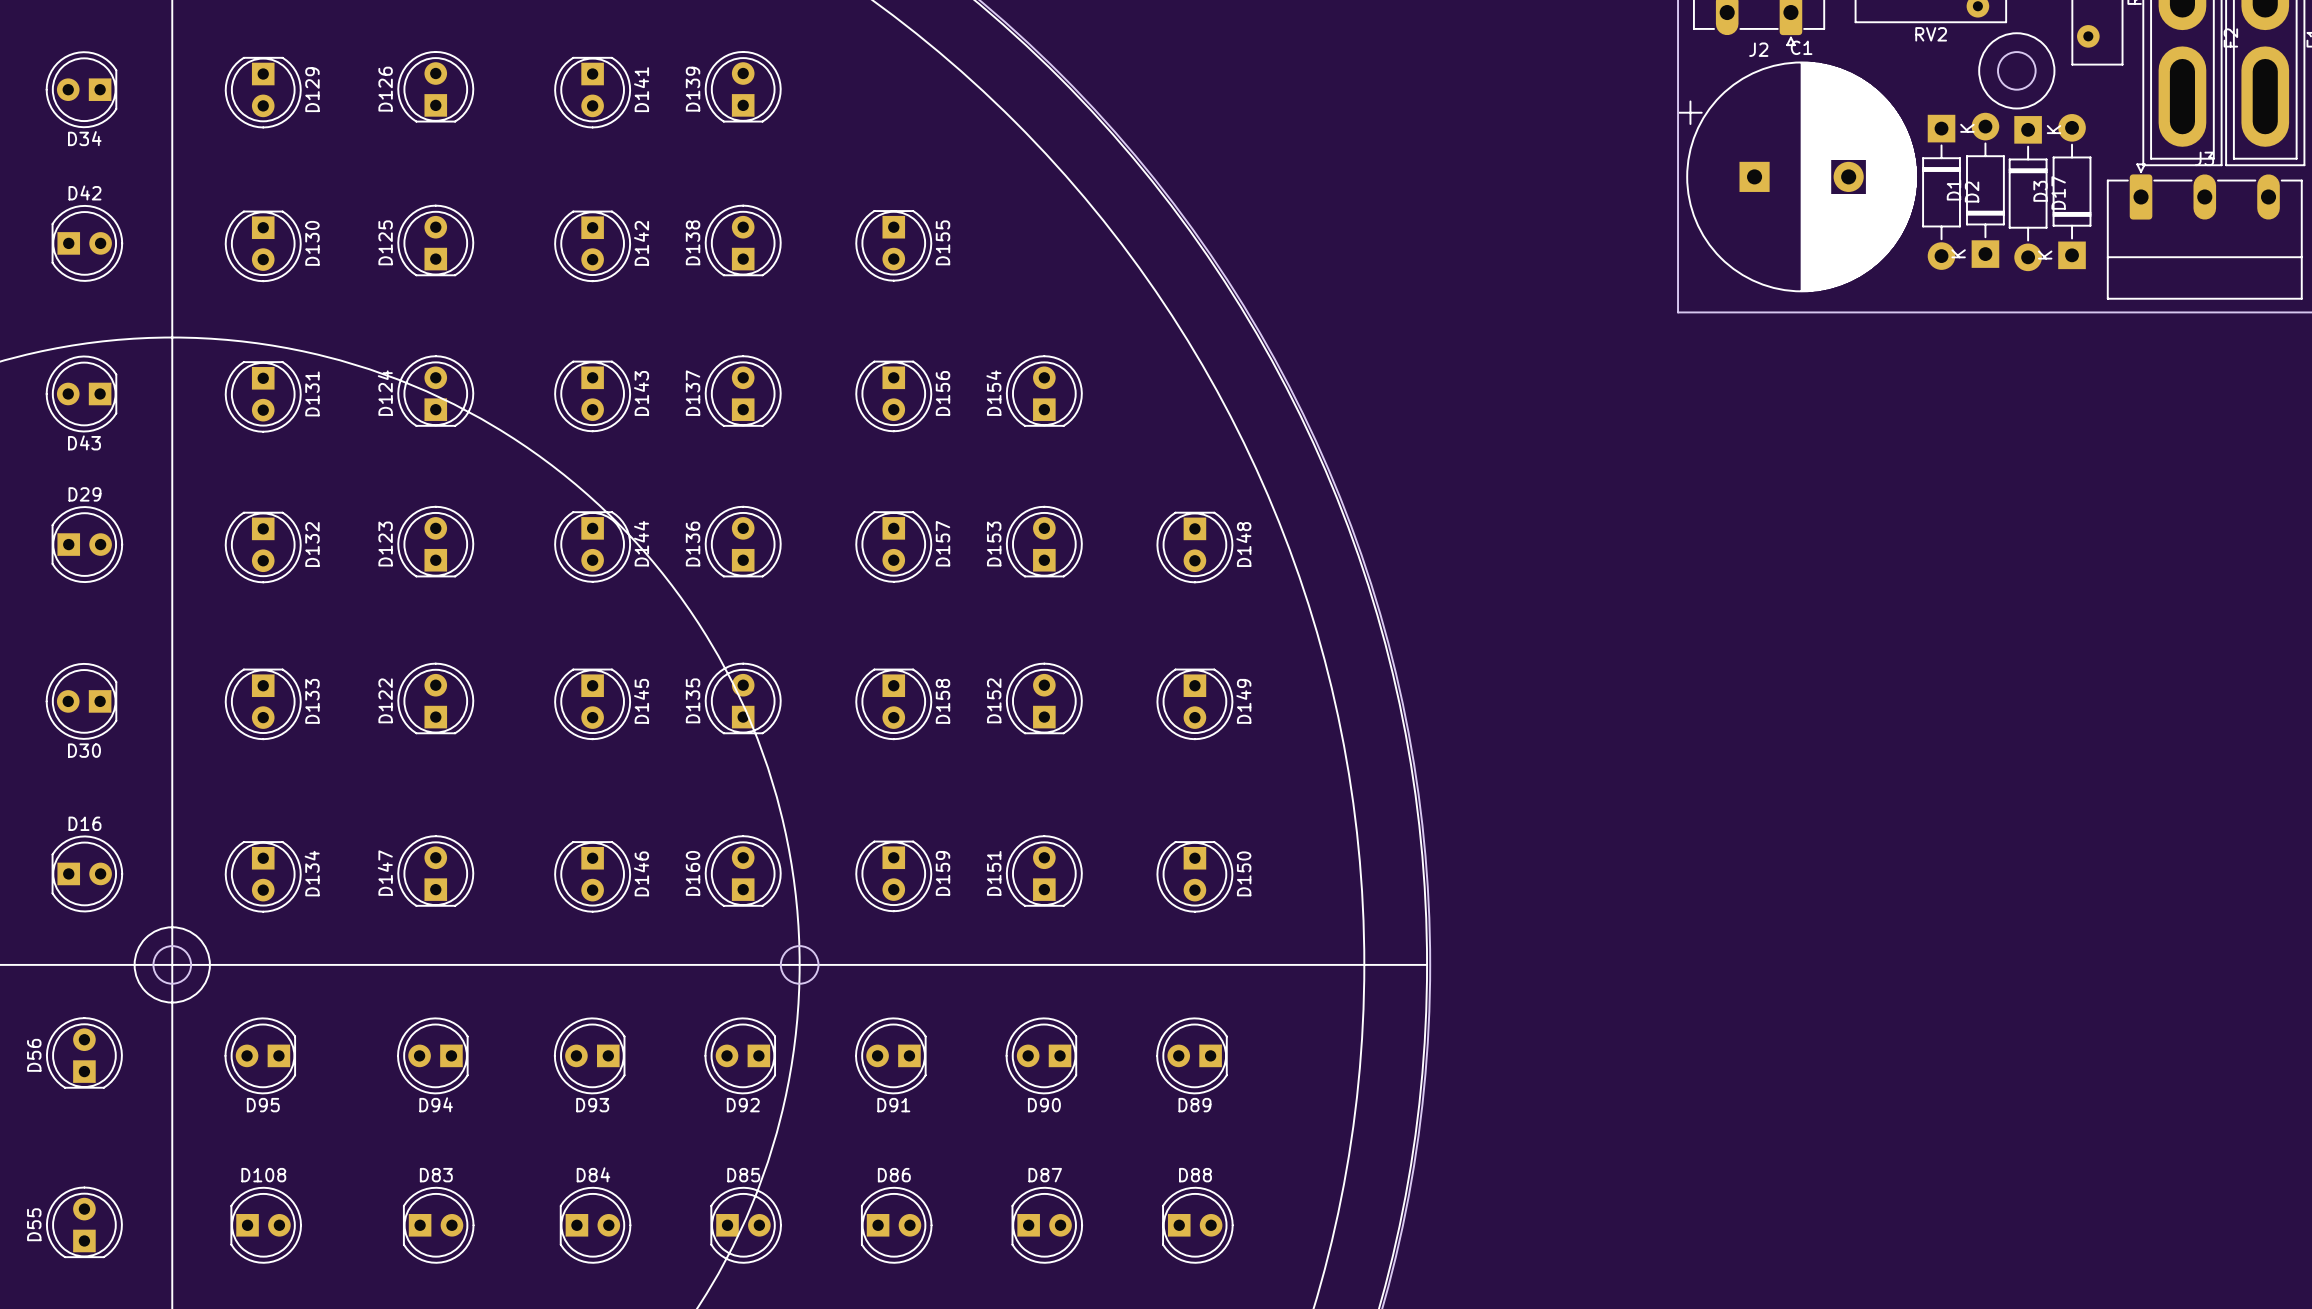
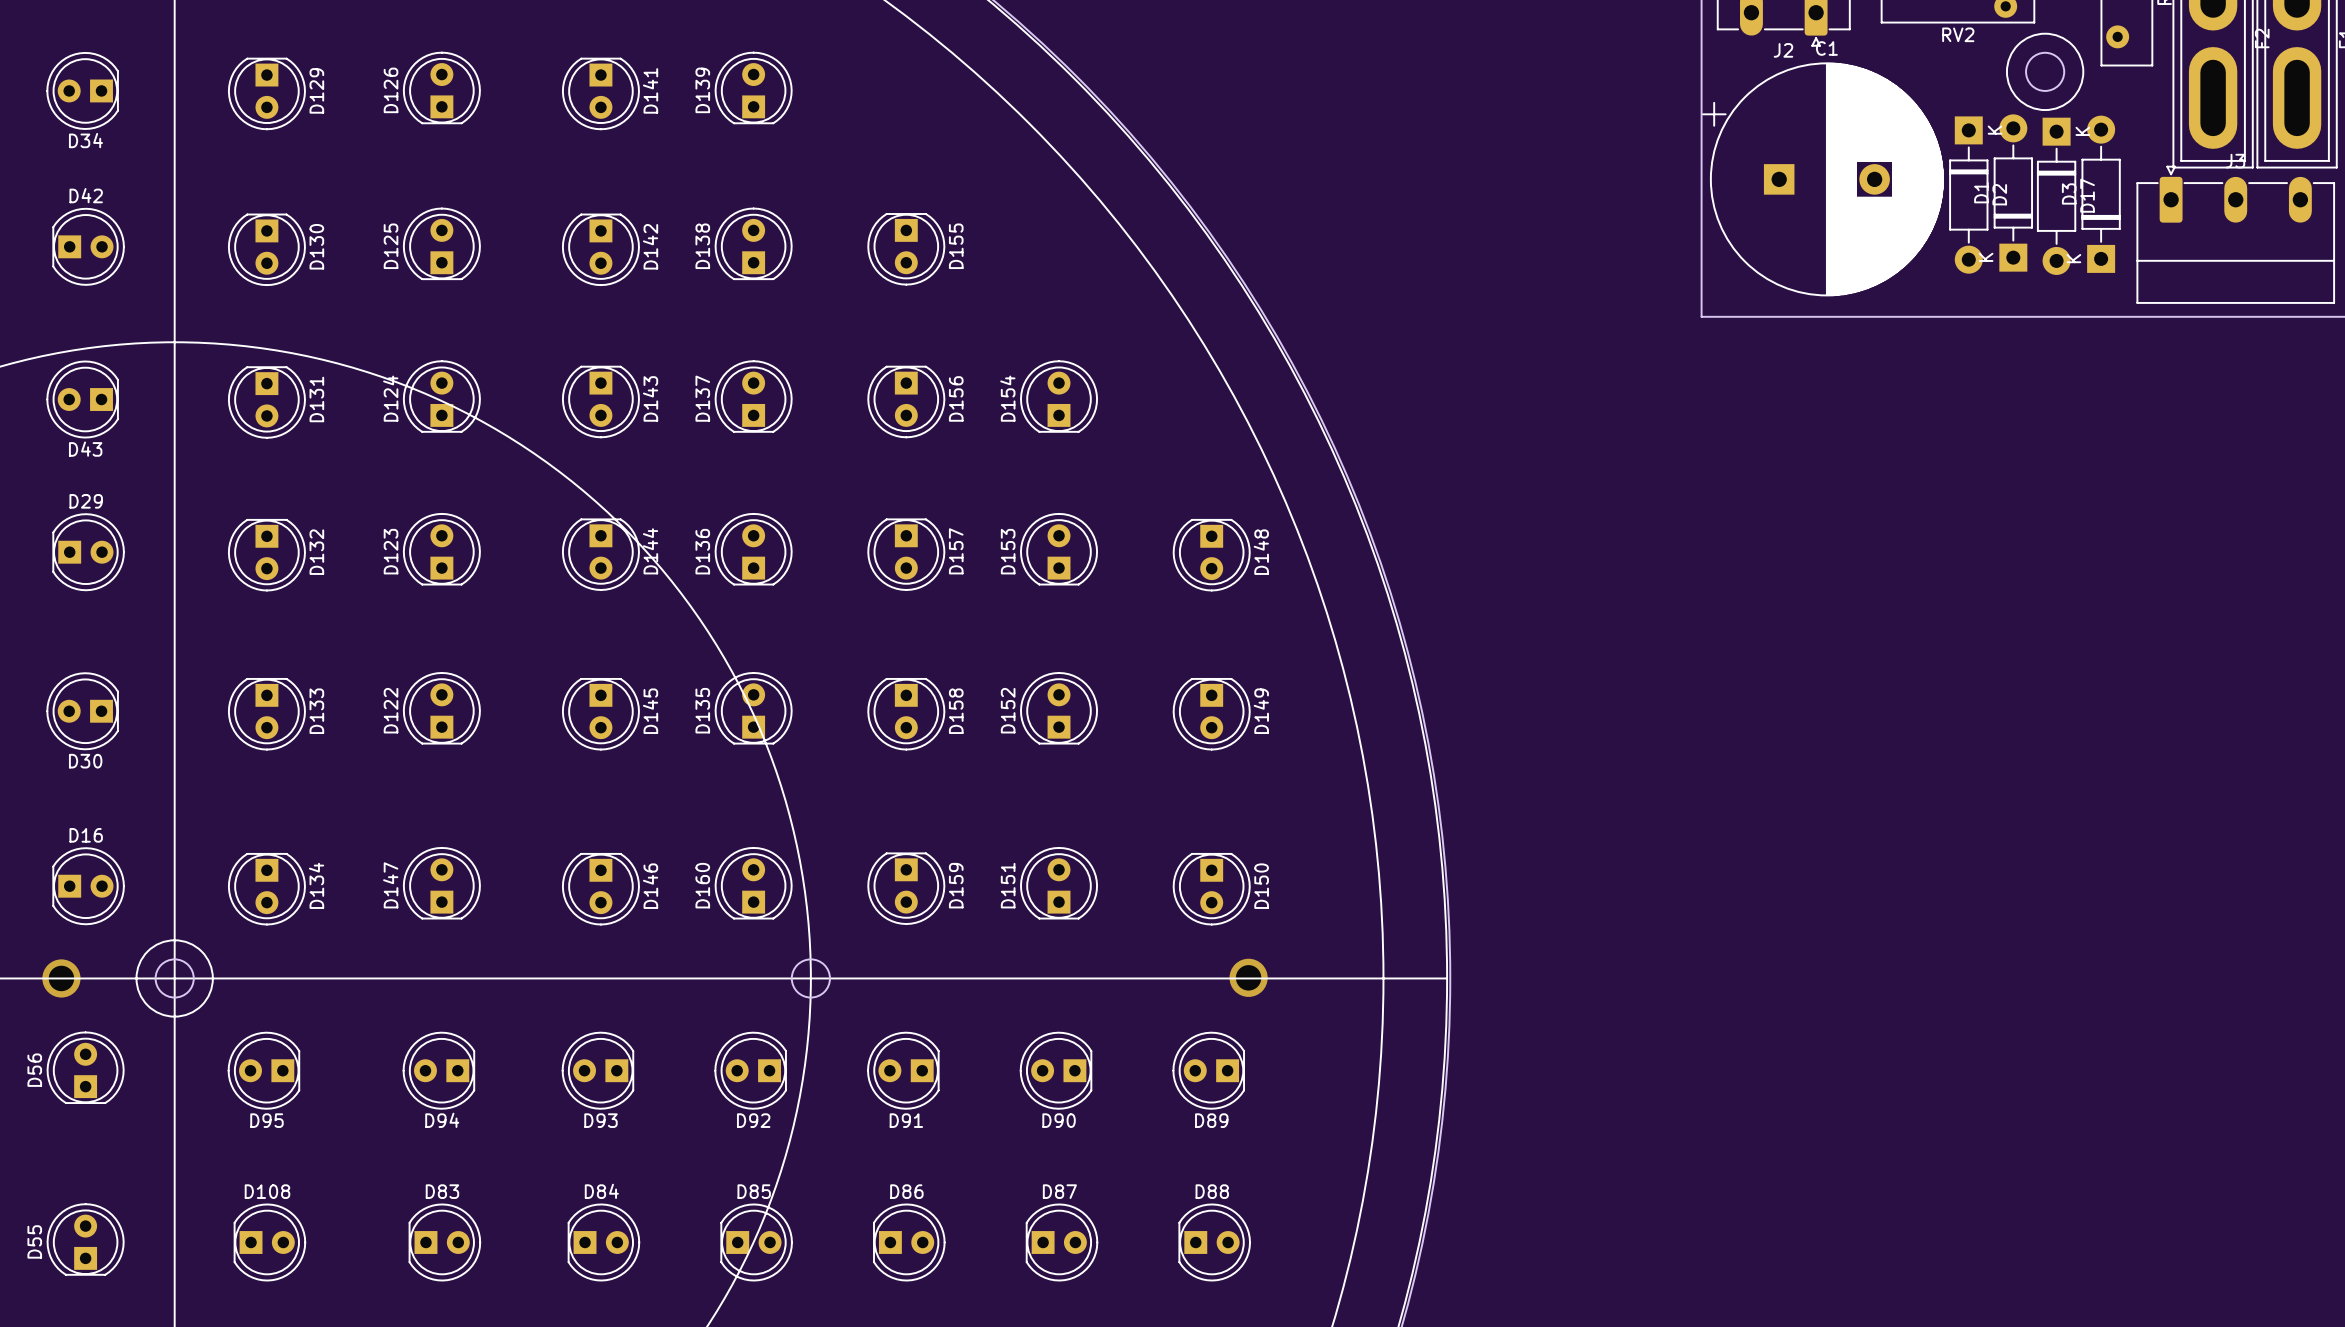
via: none -> (61, 978)
via: none -> (1248, 977)

